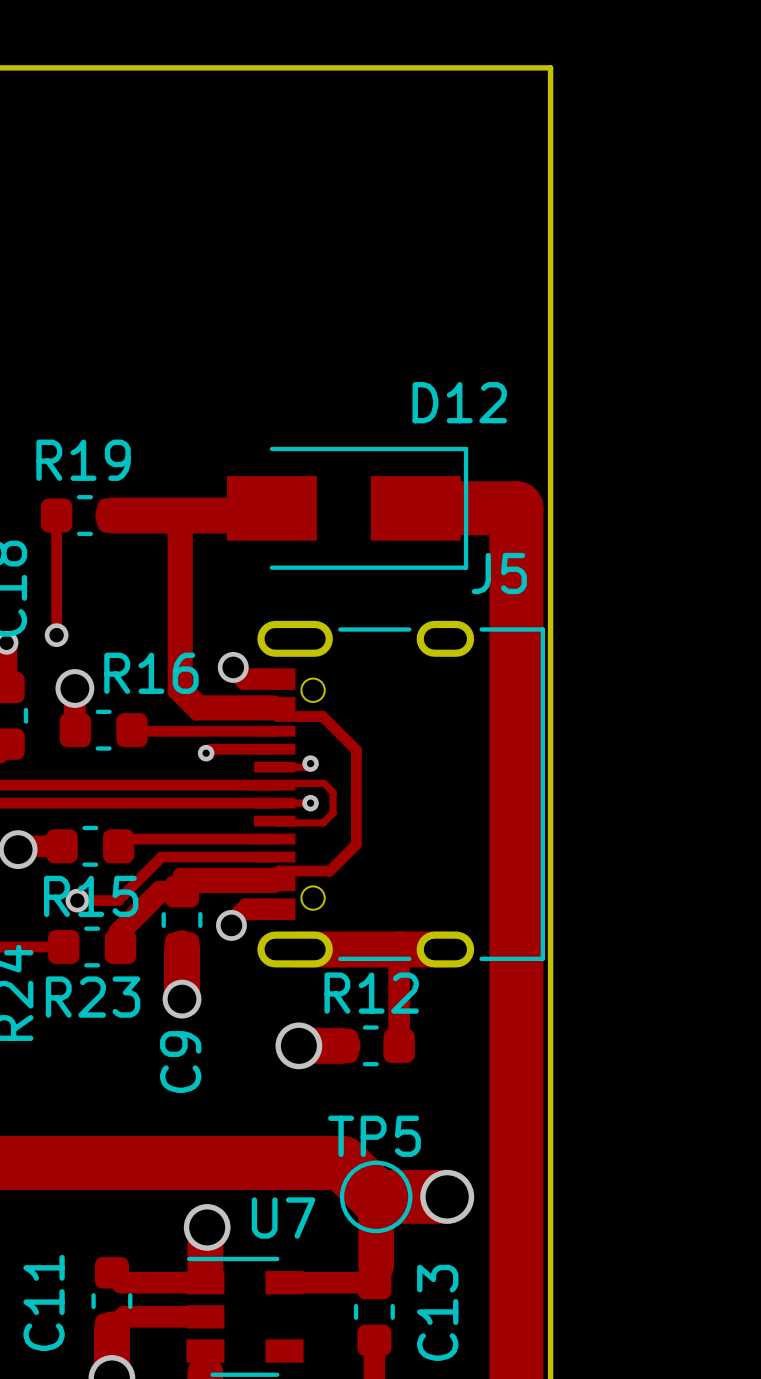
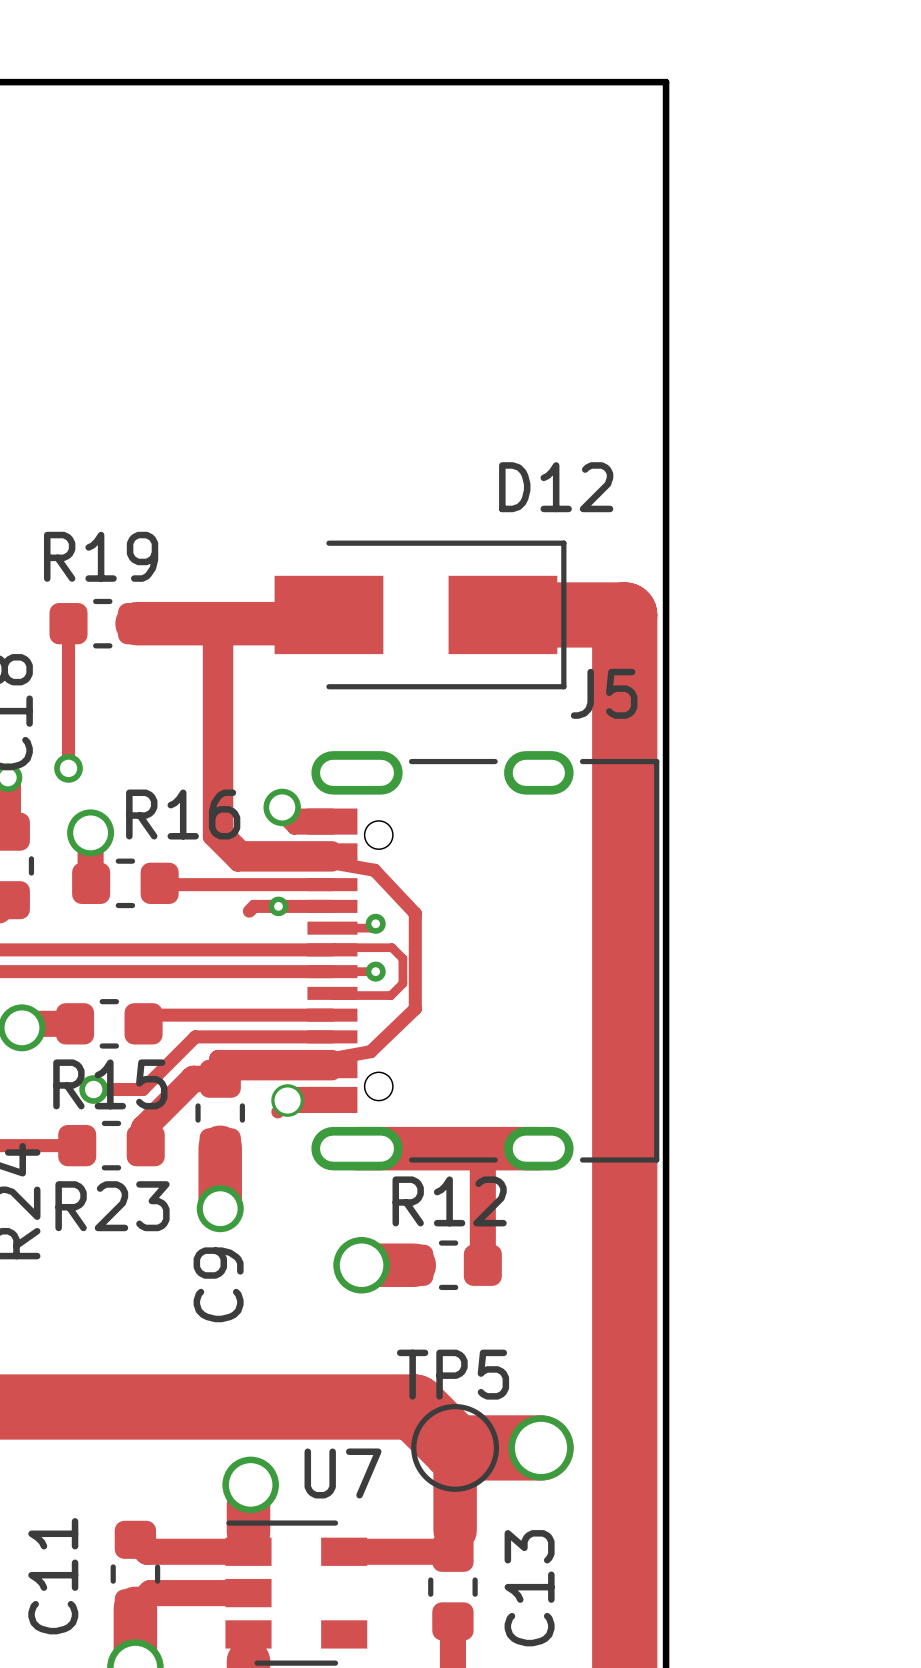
track: (274, 713) (277, 716) (322, 716) (356, 750) (356, 844) (329, 871) (278, 871) (274, 875) -> (332, 862) (374, 870) (415, 913) (415, 1008) (370, 1051) (332, 1058)
via position: (206, 753) -> (278, 906)
via position: (231, 925) -> (287, 1100)

